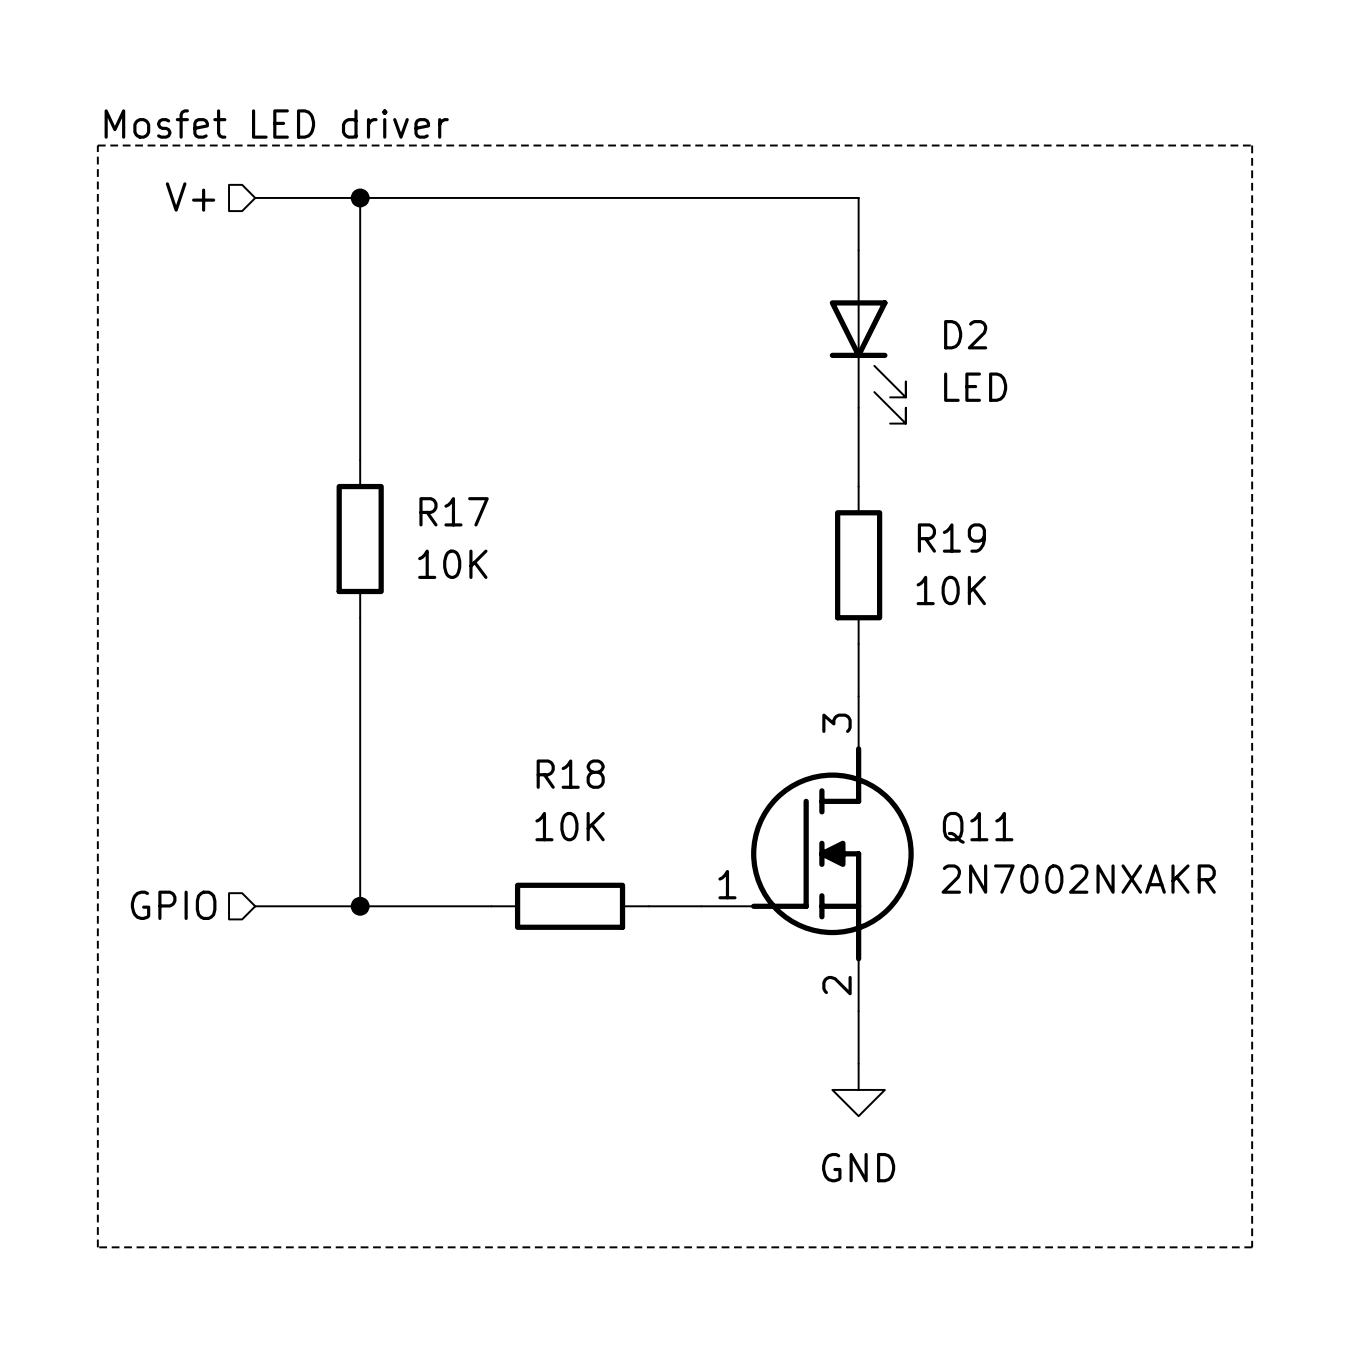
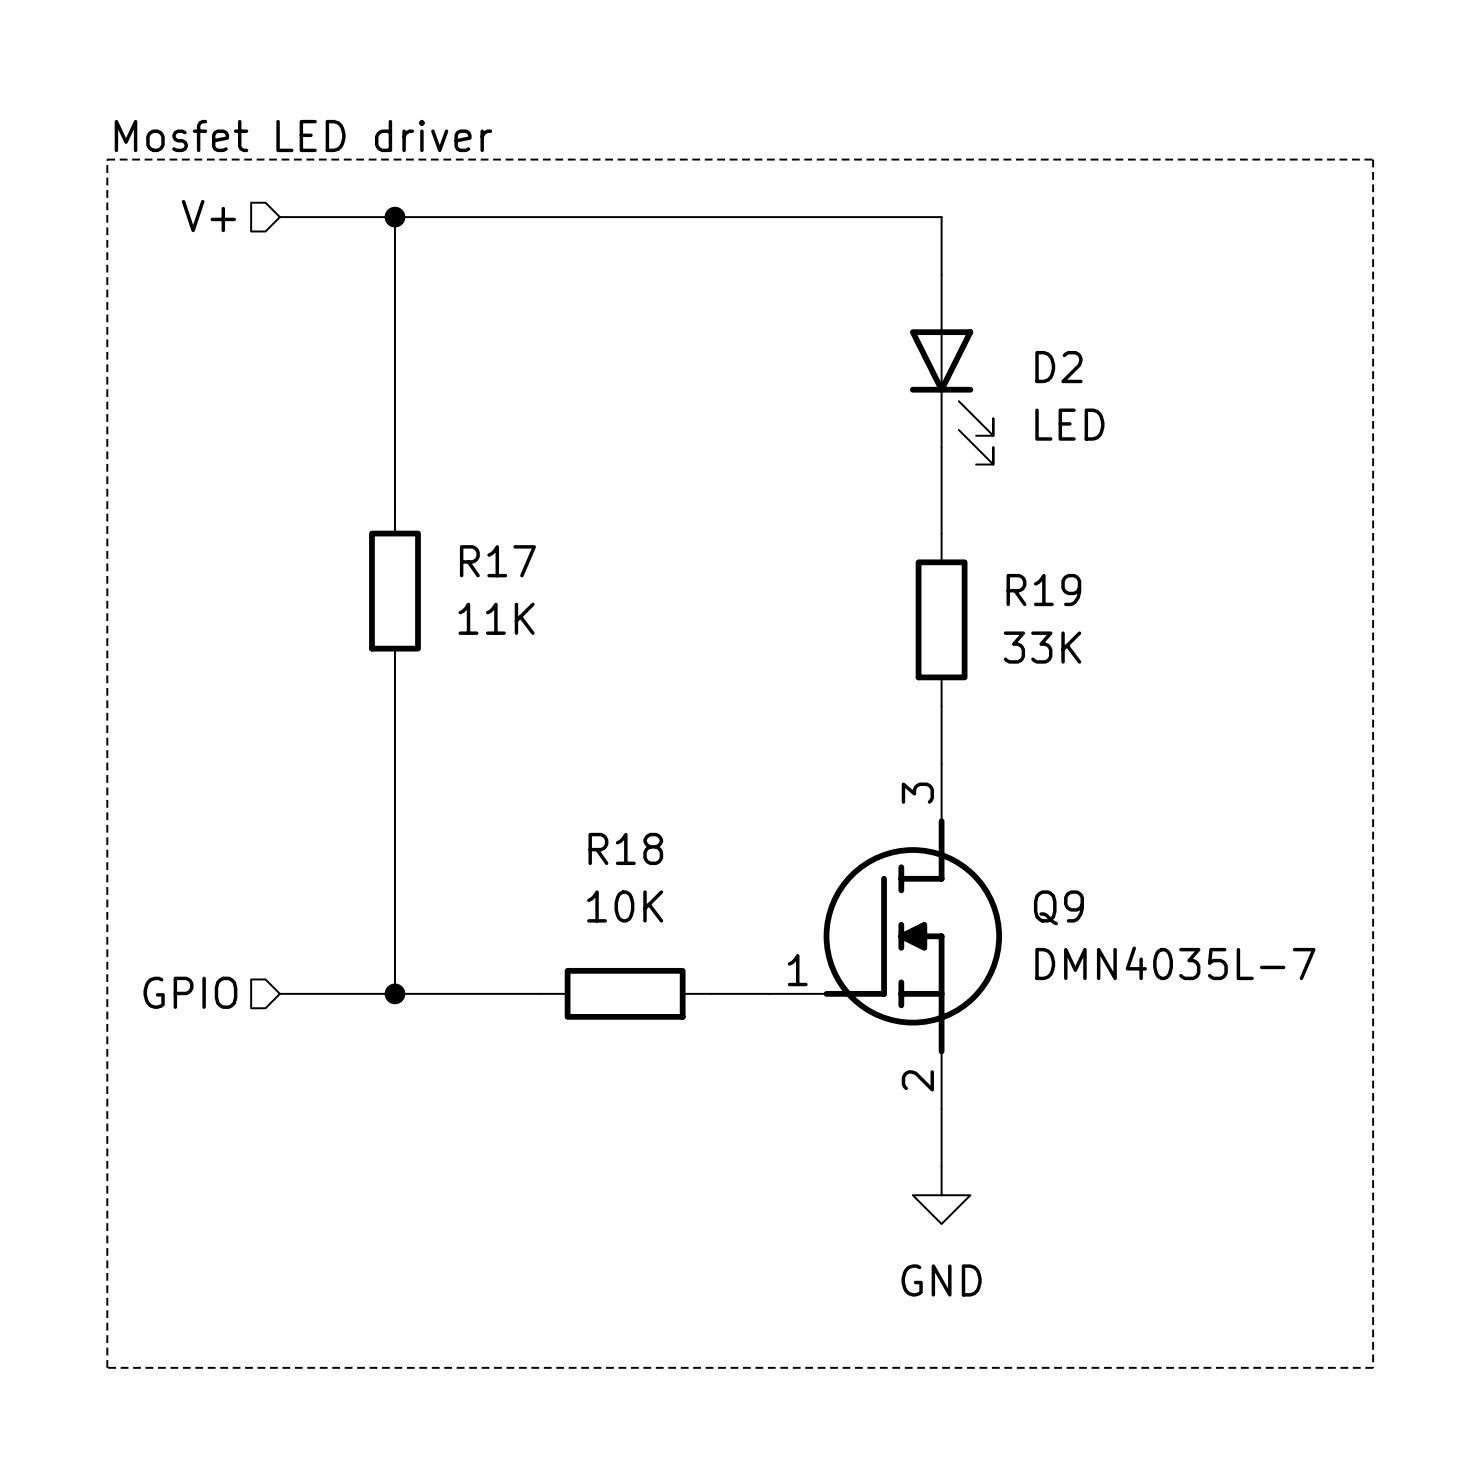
R17 value: 10K (452, 564) -> 11K (496, 618)
R19 value: 10K (951, 590) -> 33K (1042, 647)
Q11 name: Q11 (978, 827) -> Q9 (1058, 907)
Q11 value: 2N7002NXAKR (1078, 879) -> DMN4035L-7 (1175, 963)

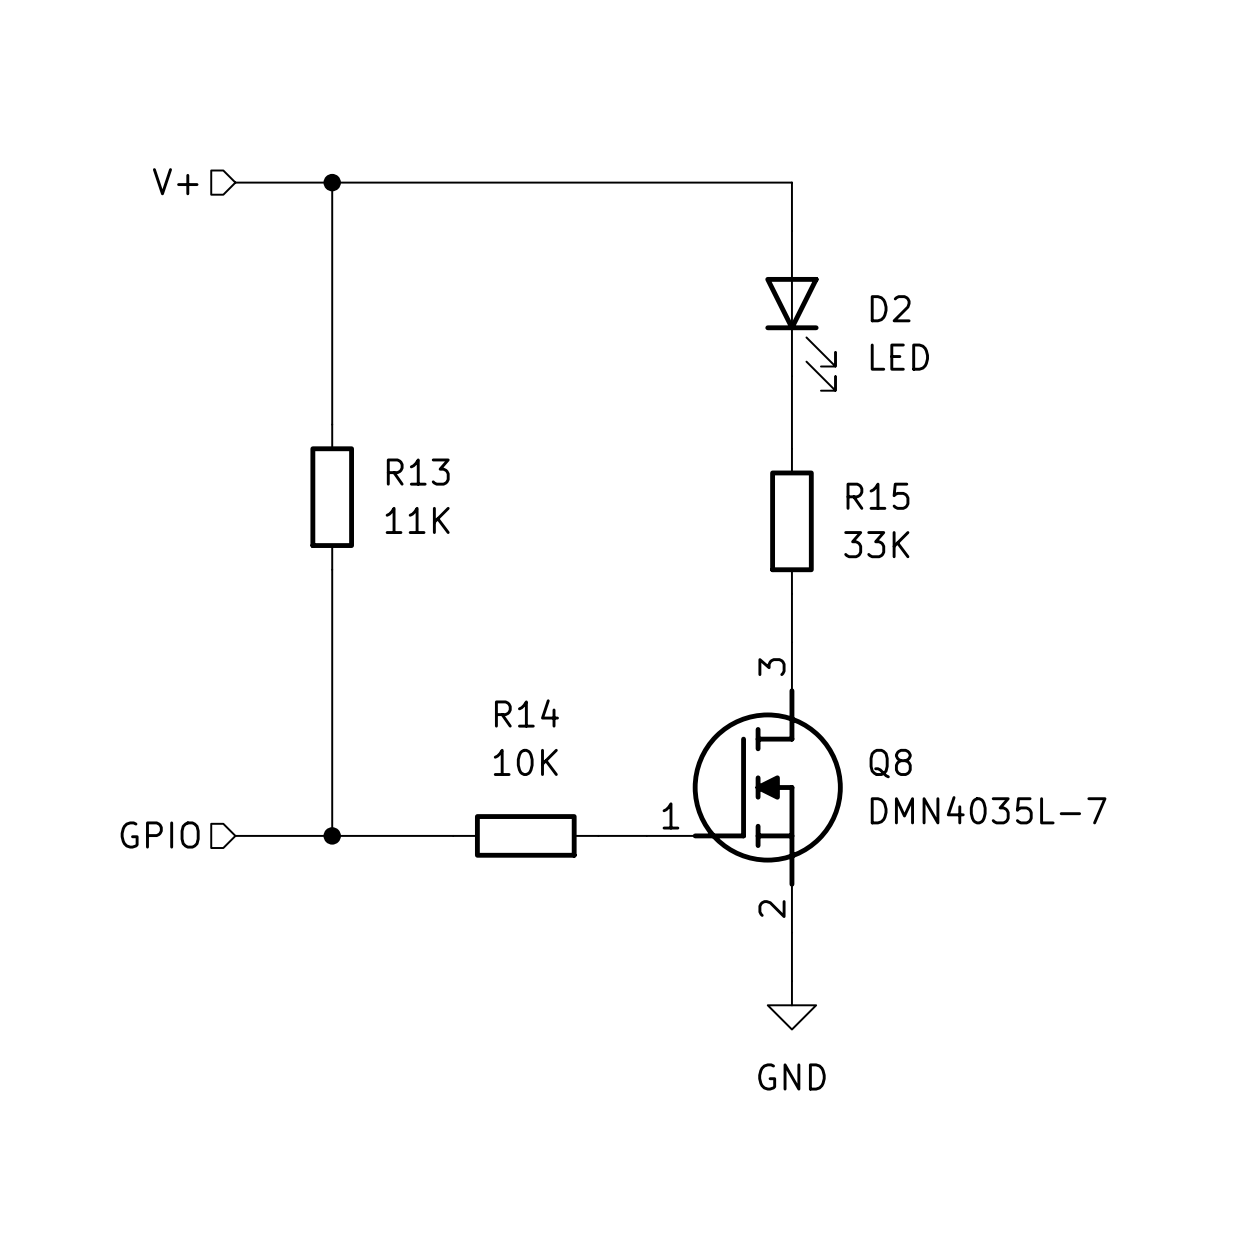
text: Mosfet LED driver (303, 136) -> none
line: (107, 159) (1373, 159) (1373, 1367) (107, 1367) (107, 159) -> none
R17 name: R17 (497, 561) -> R13 (418, 472)
R19 name: R19 (1043, 590) -> R15 (877, 496)
R18 name: R18 (625, 848) -> R14 (526, 713)
Q9 name: Q9 (1058, 907) -> Q8 (890, 763)

